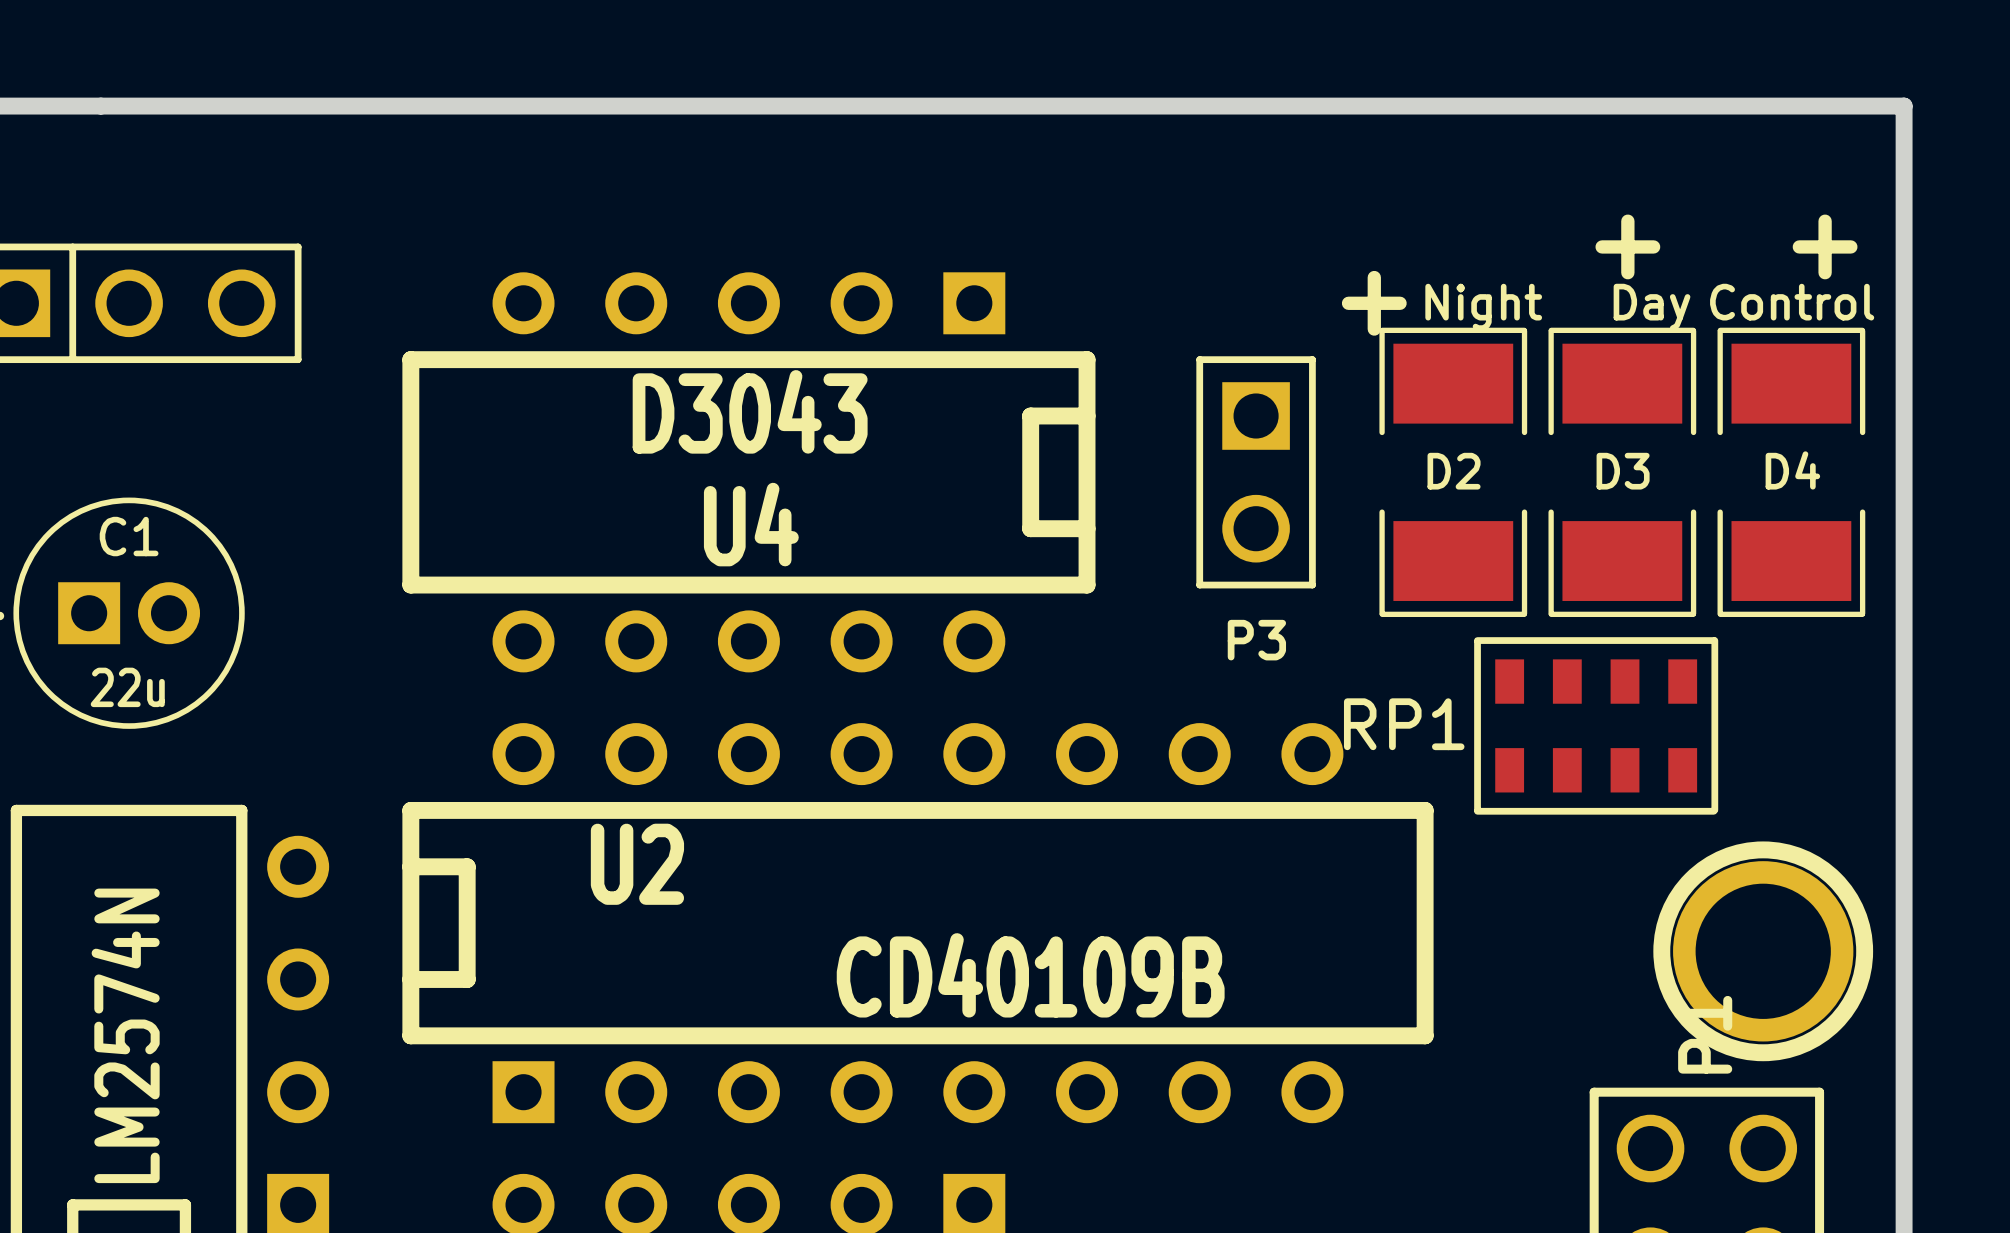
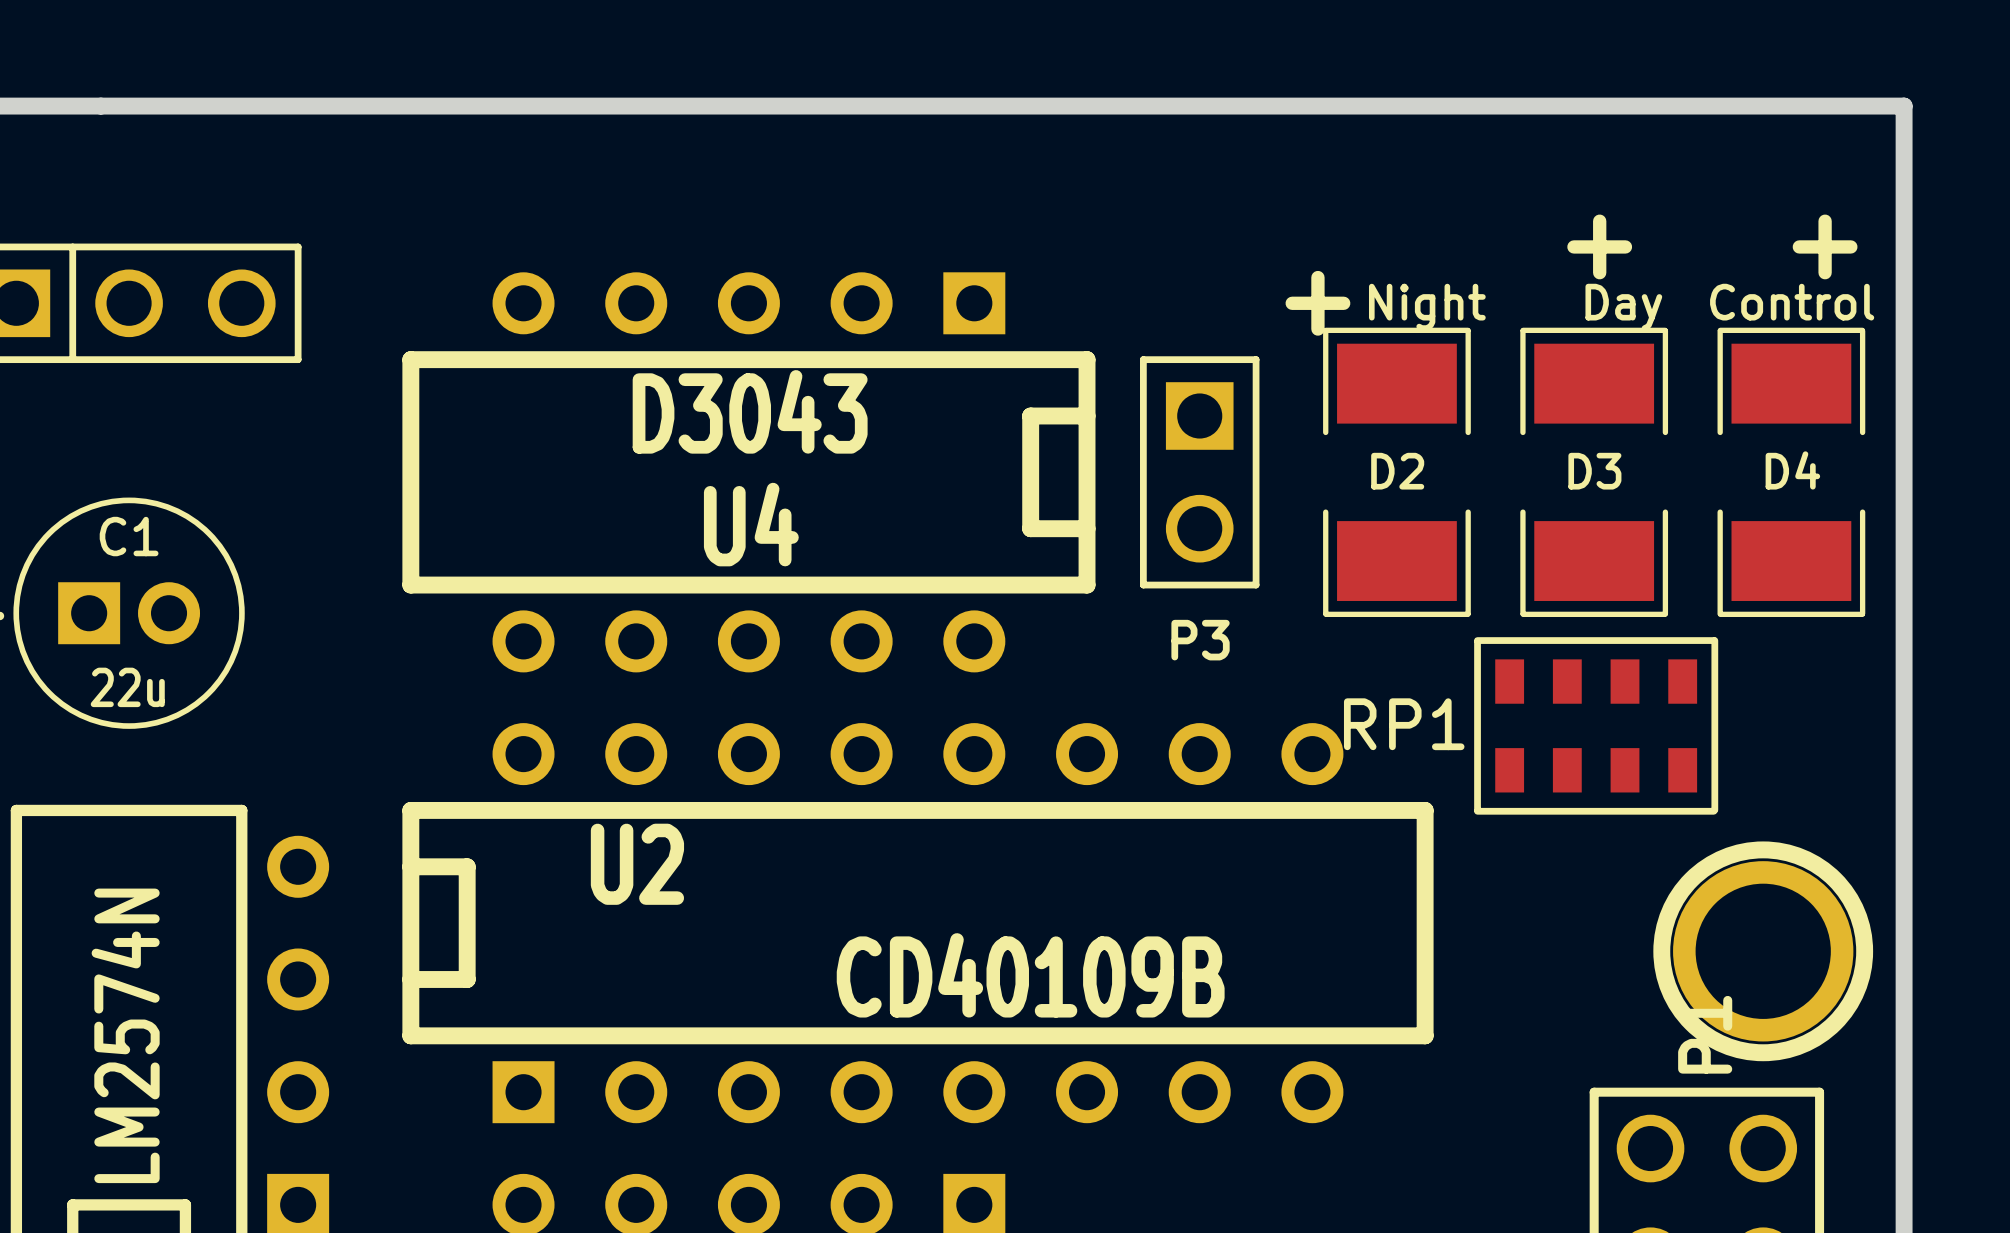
P3 position: (1256, 472) -> (1199, 472)
D2 position: (1453, 472) -> (1396, 472)
D3 position: (1622, 472) -> (1594, 472)

